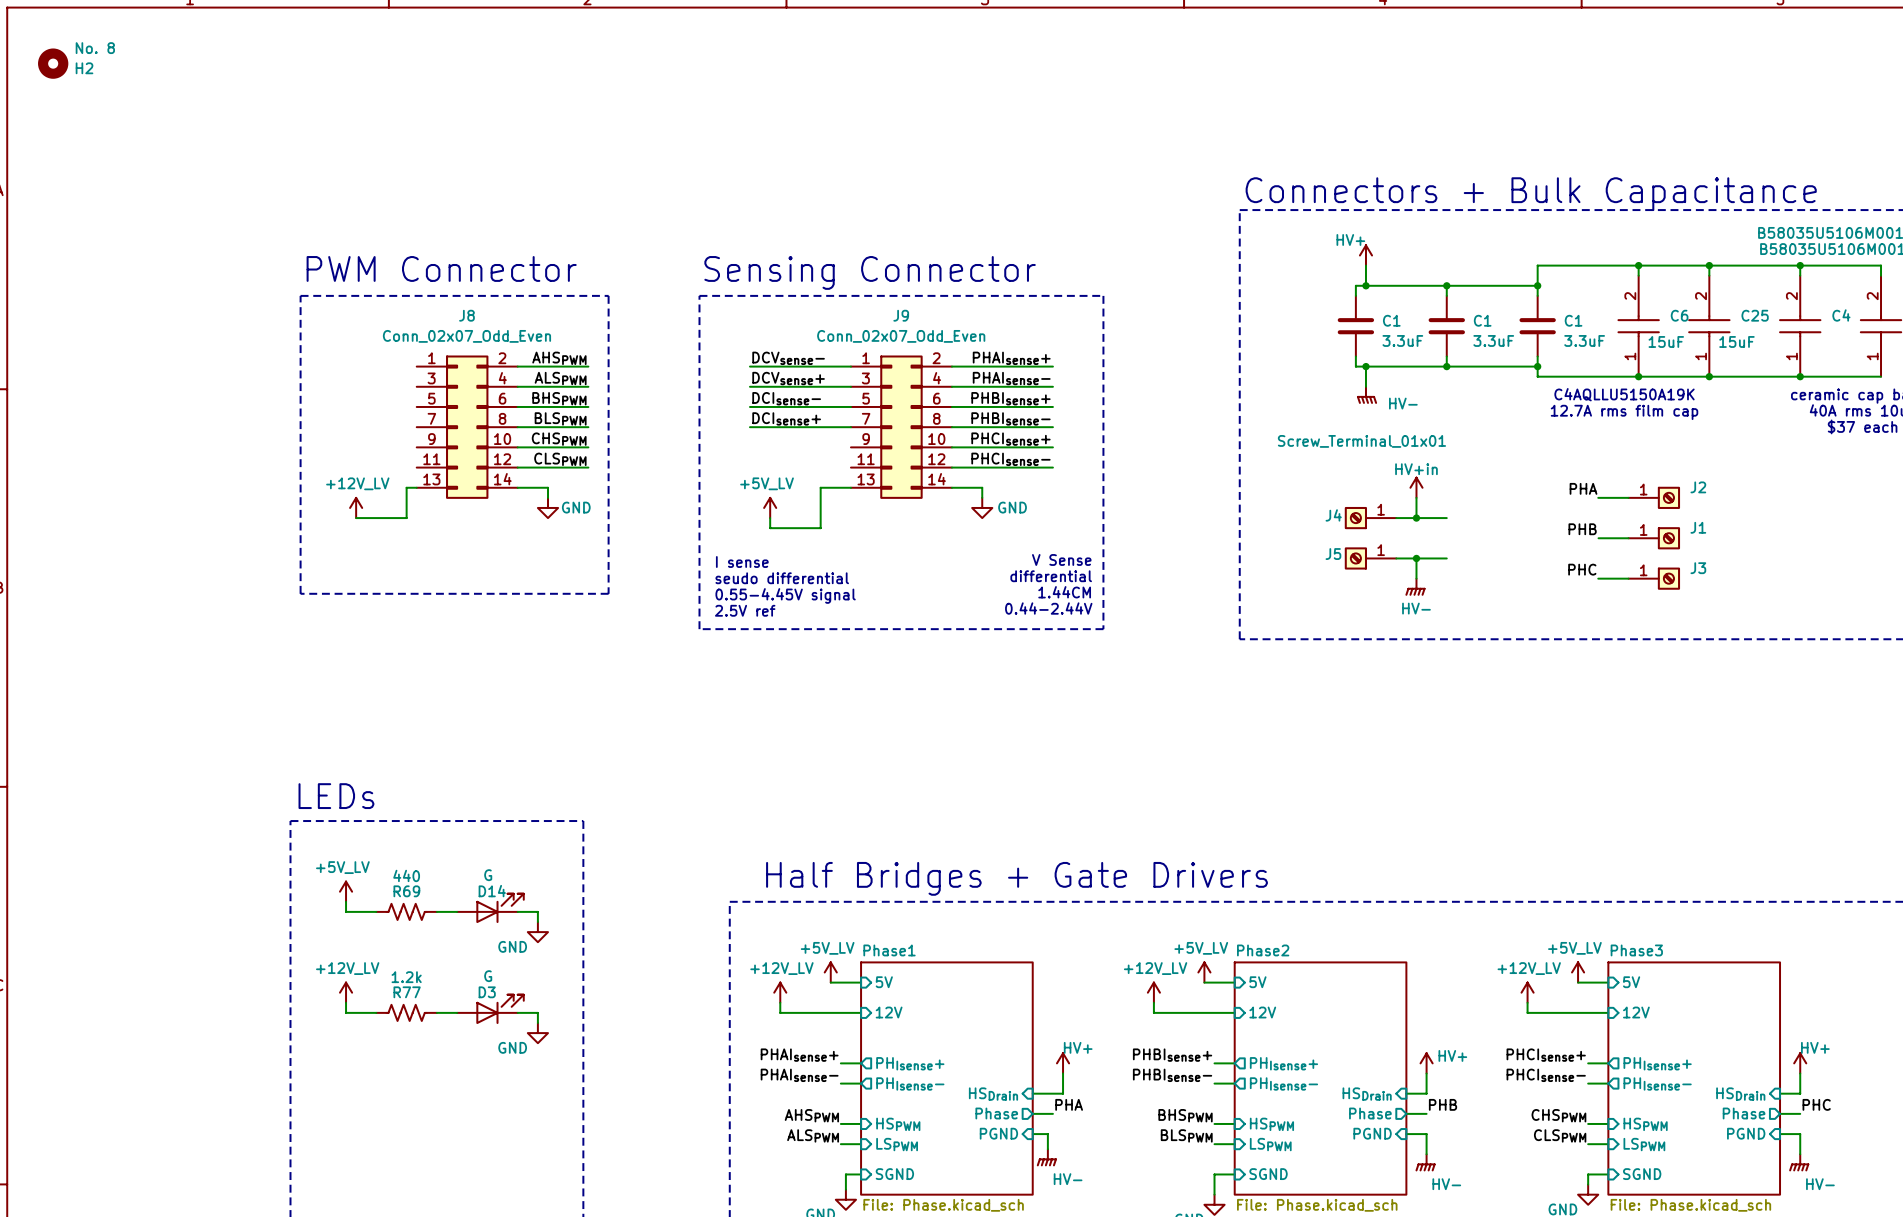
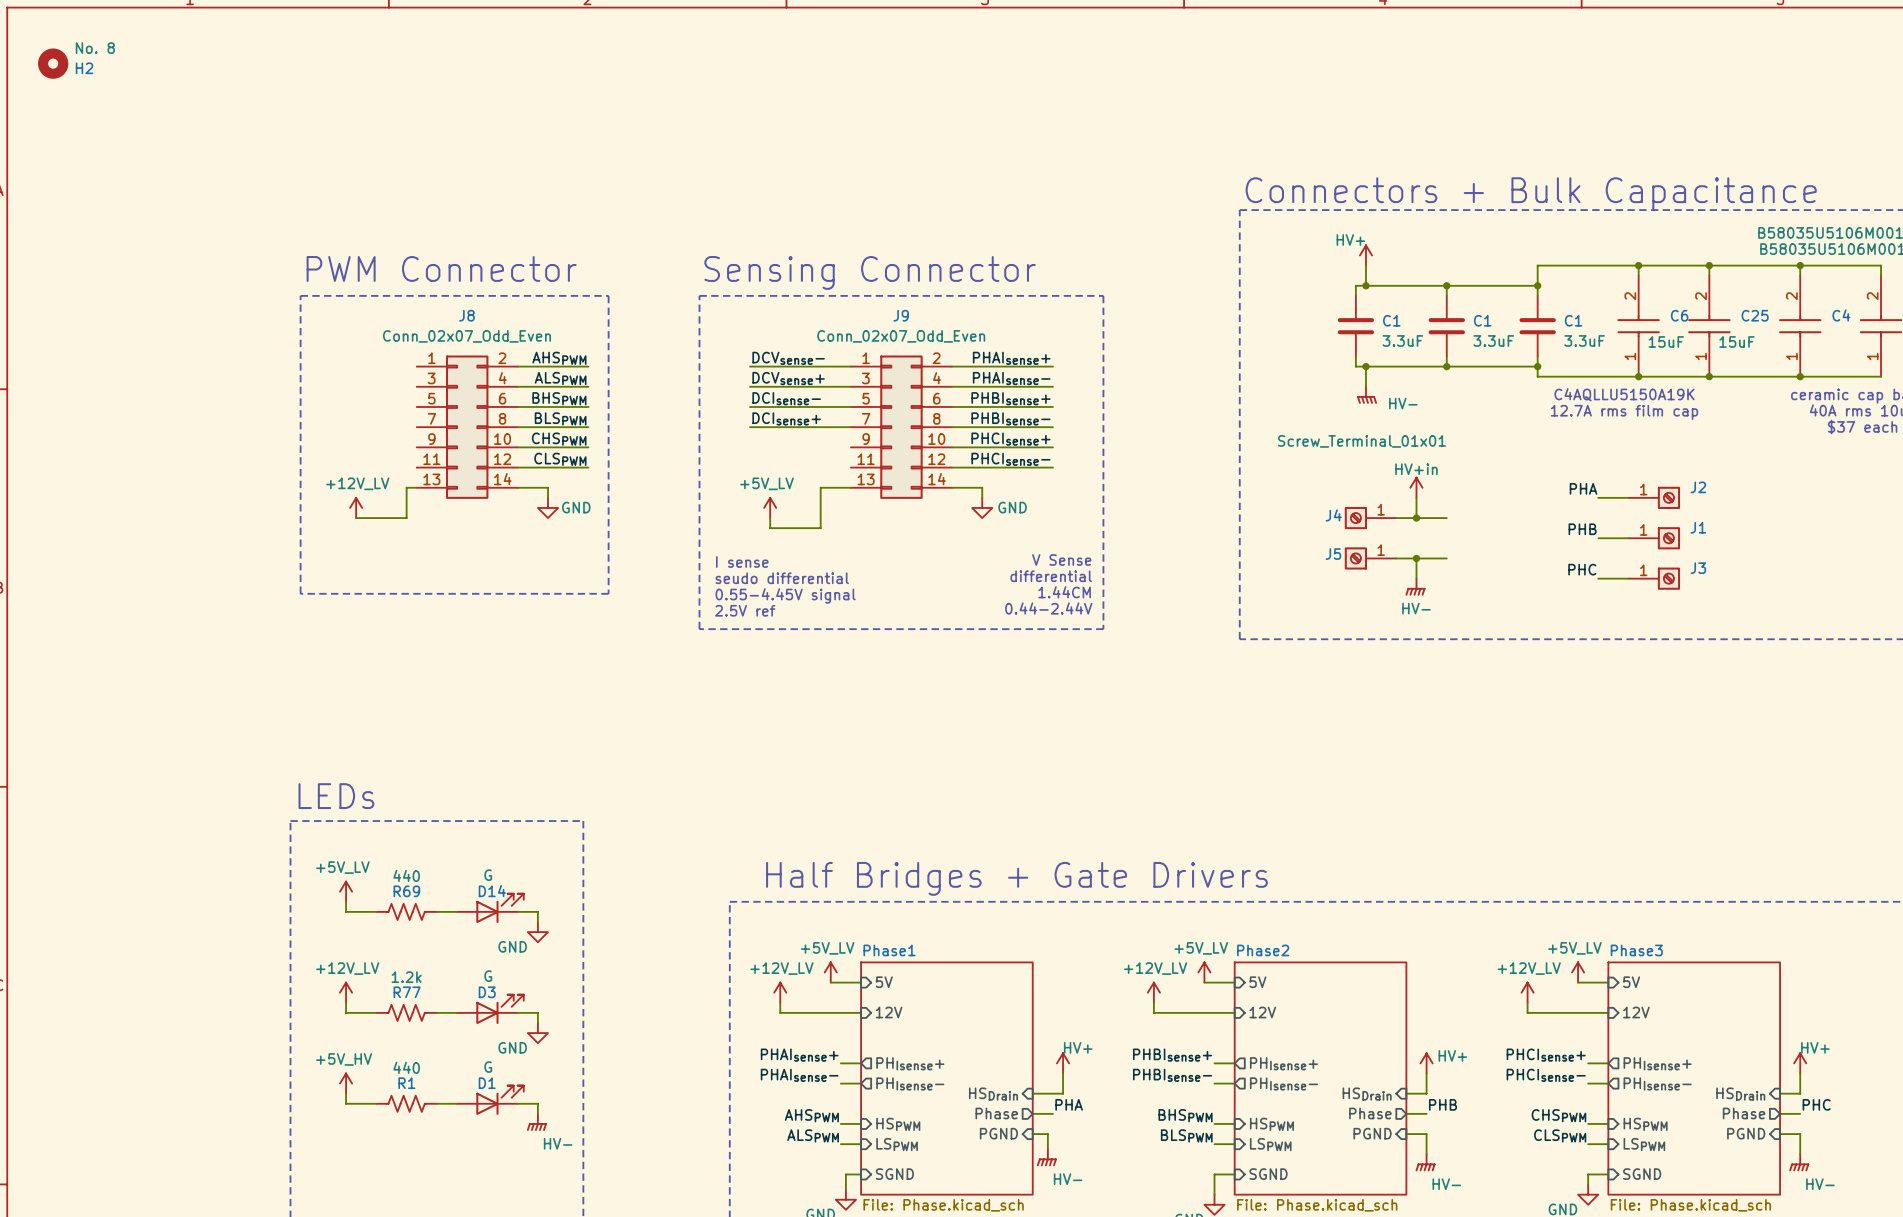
power symbol: none -> +5V_HV (346, 1083)
wire: none -> (346, 1093) (346, 1103) (376, 1103)
D1: none -> G (490, 1100)
R1: none -> 440 (406, 1103)
wire: none -> (436, 1103) (457, 1103)
wire: none -> (517, 1103) (537, 1103) (537, 1113)
power symbol: none -> HV- (536, 1122)

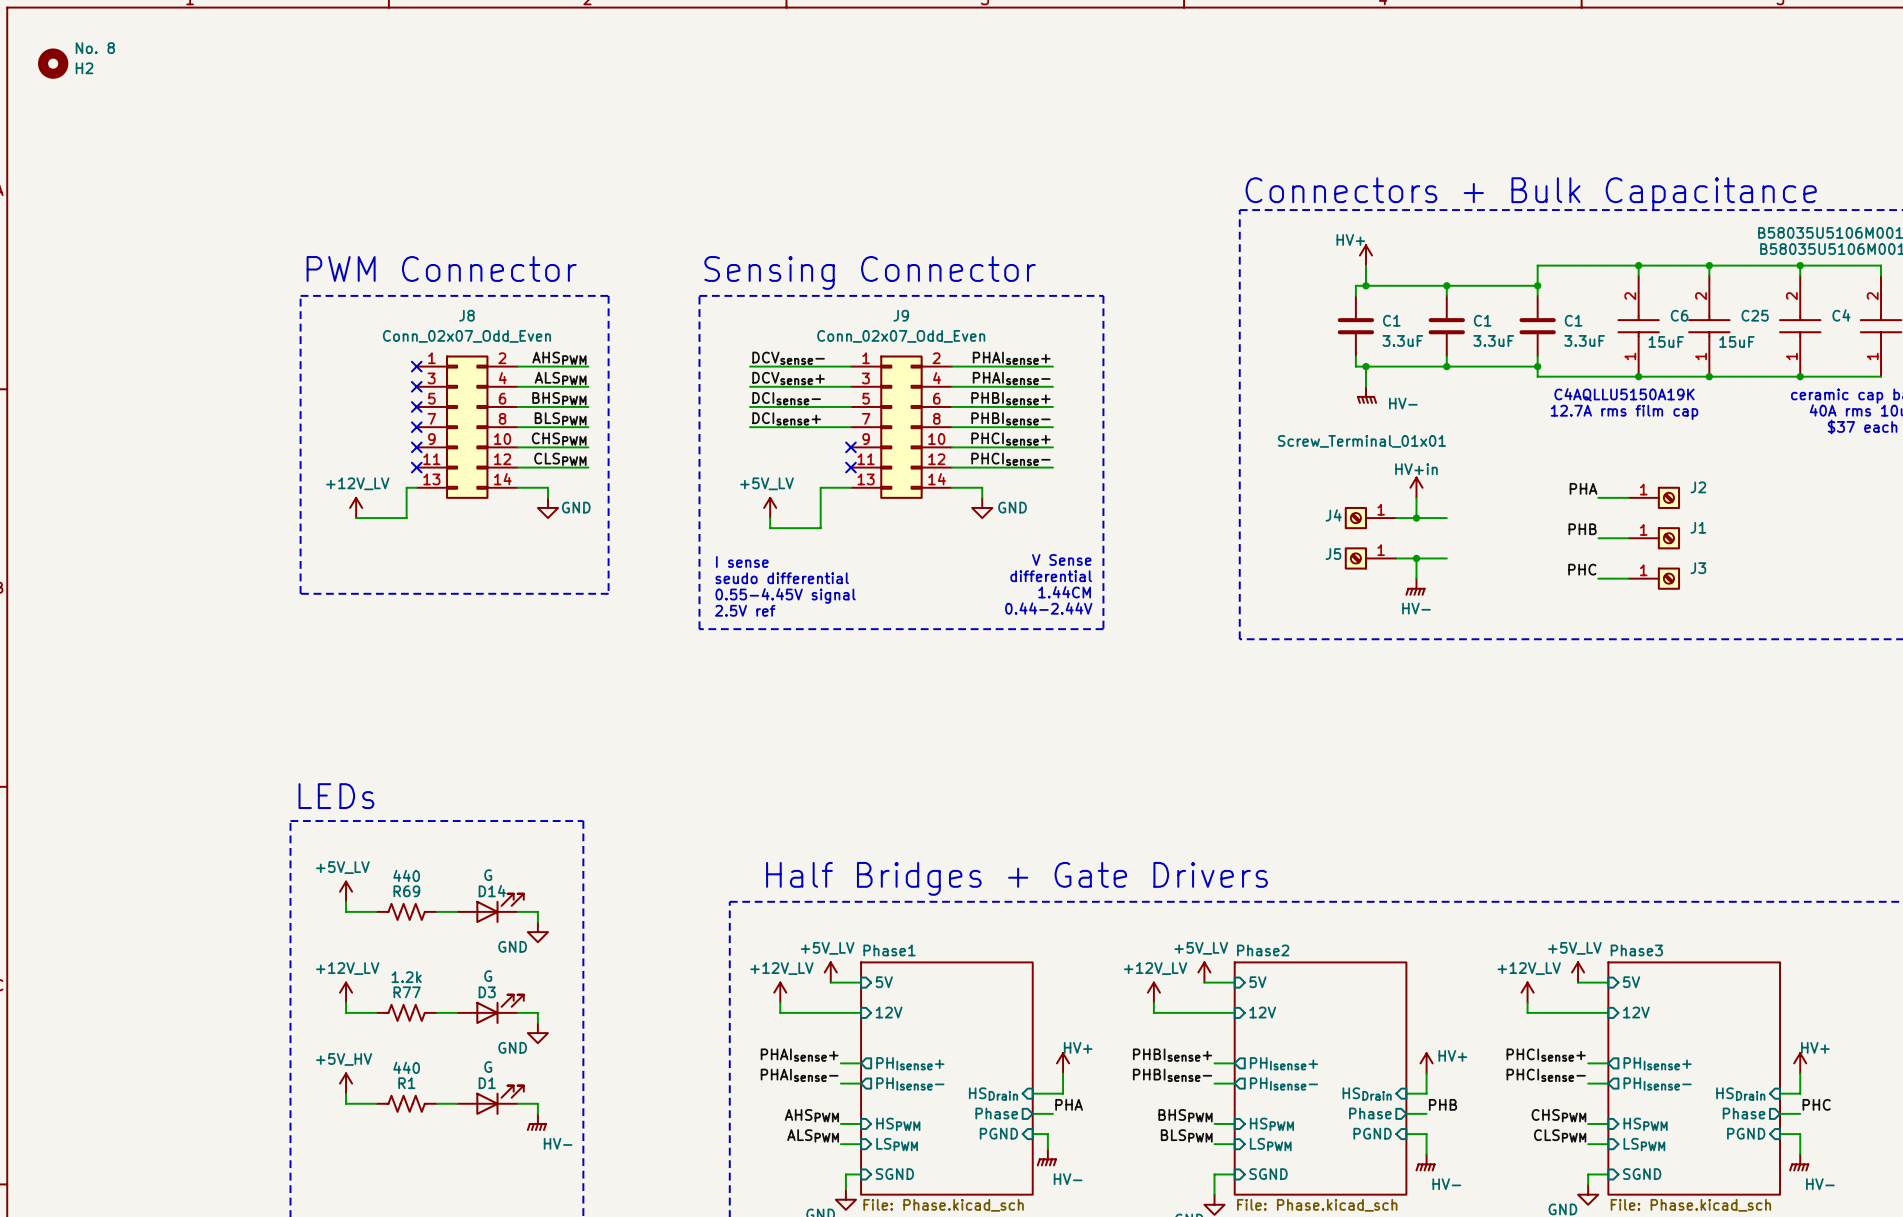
no-connect mark: none -> (416, 366)
no-connect mark: none -> (416, 386)
no-connect mark: none -> (416, 406)
no-connect mark: none -> (416, 427)
no-connect mark: none -> (416, 447)
no-connect mark: none -> (850, 447)
no-connect mark: none -> (416, 467)
no-connect mark: none -> (850, 467)

